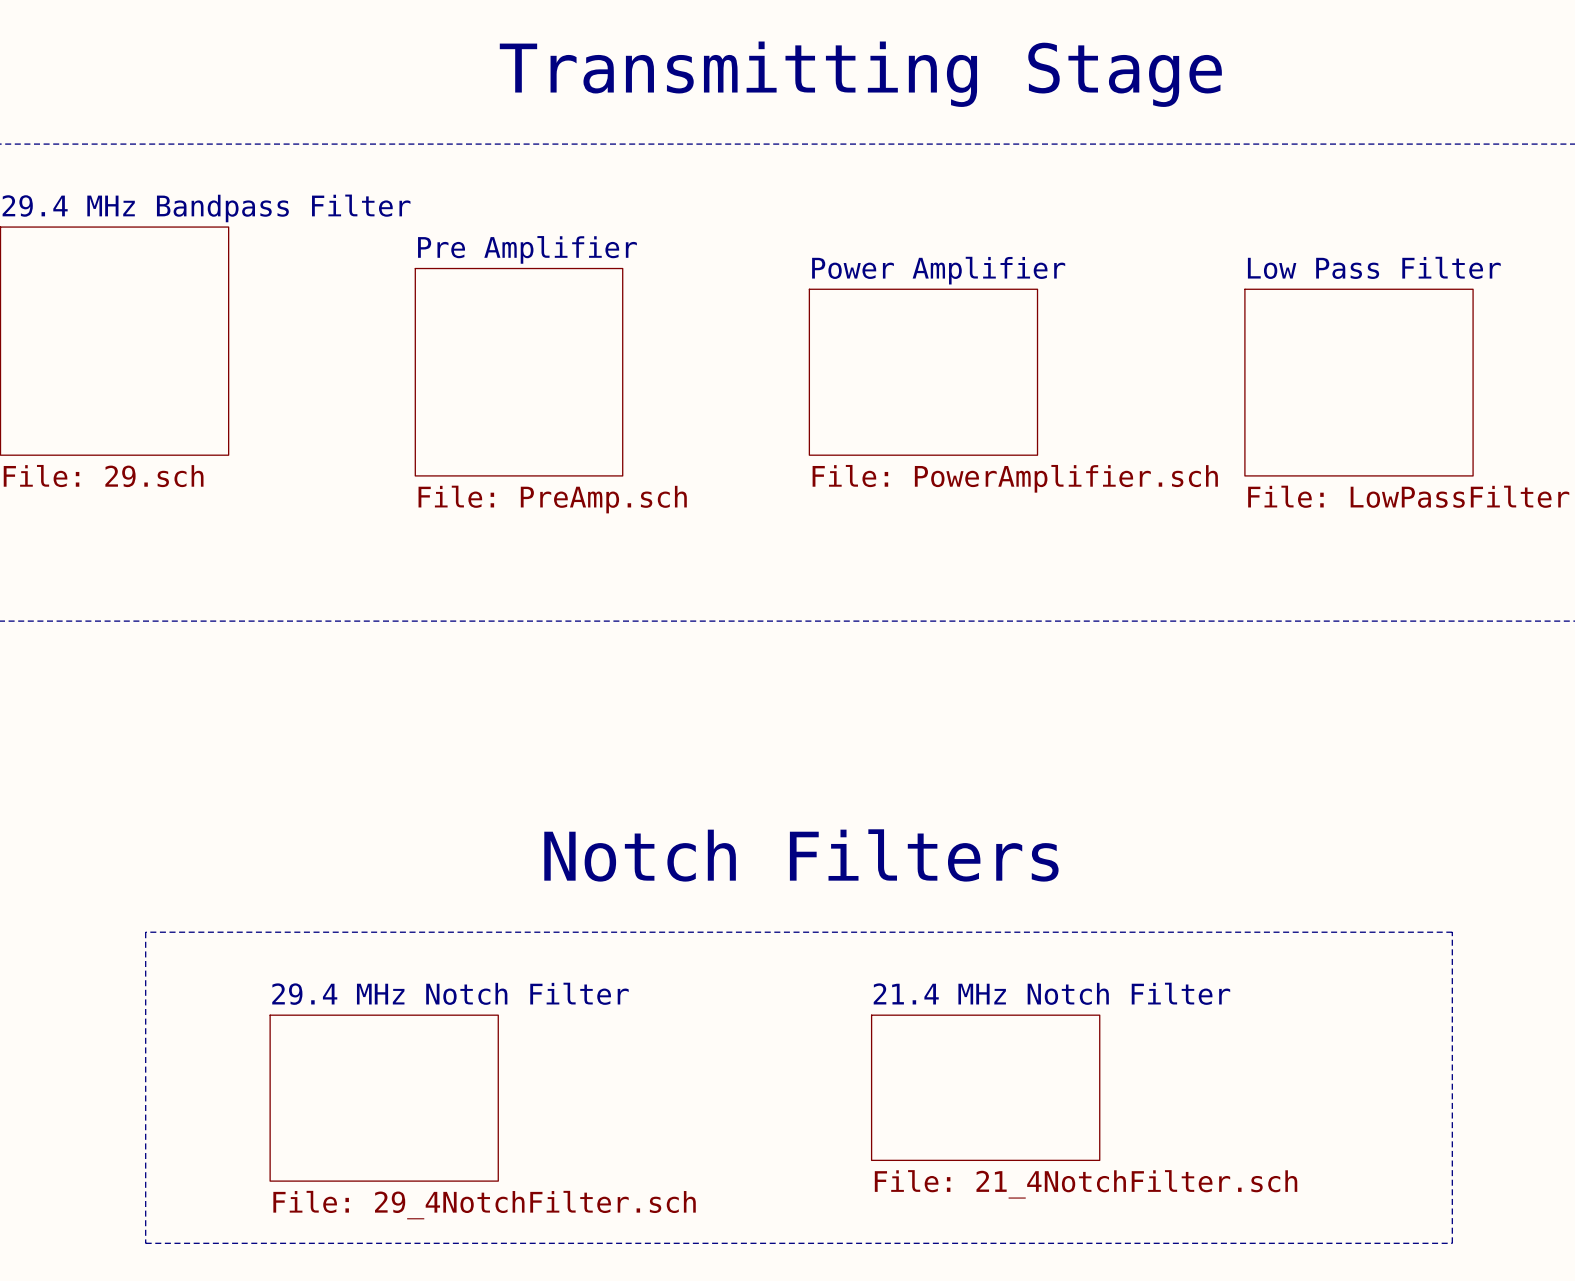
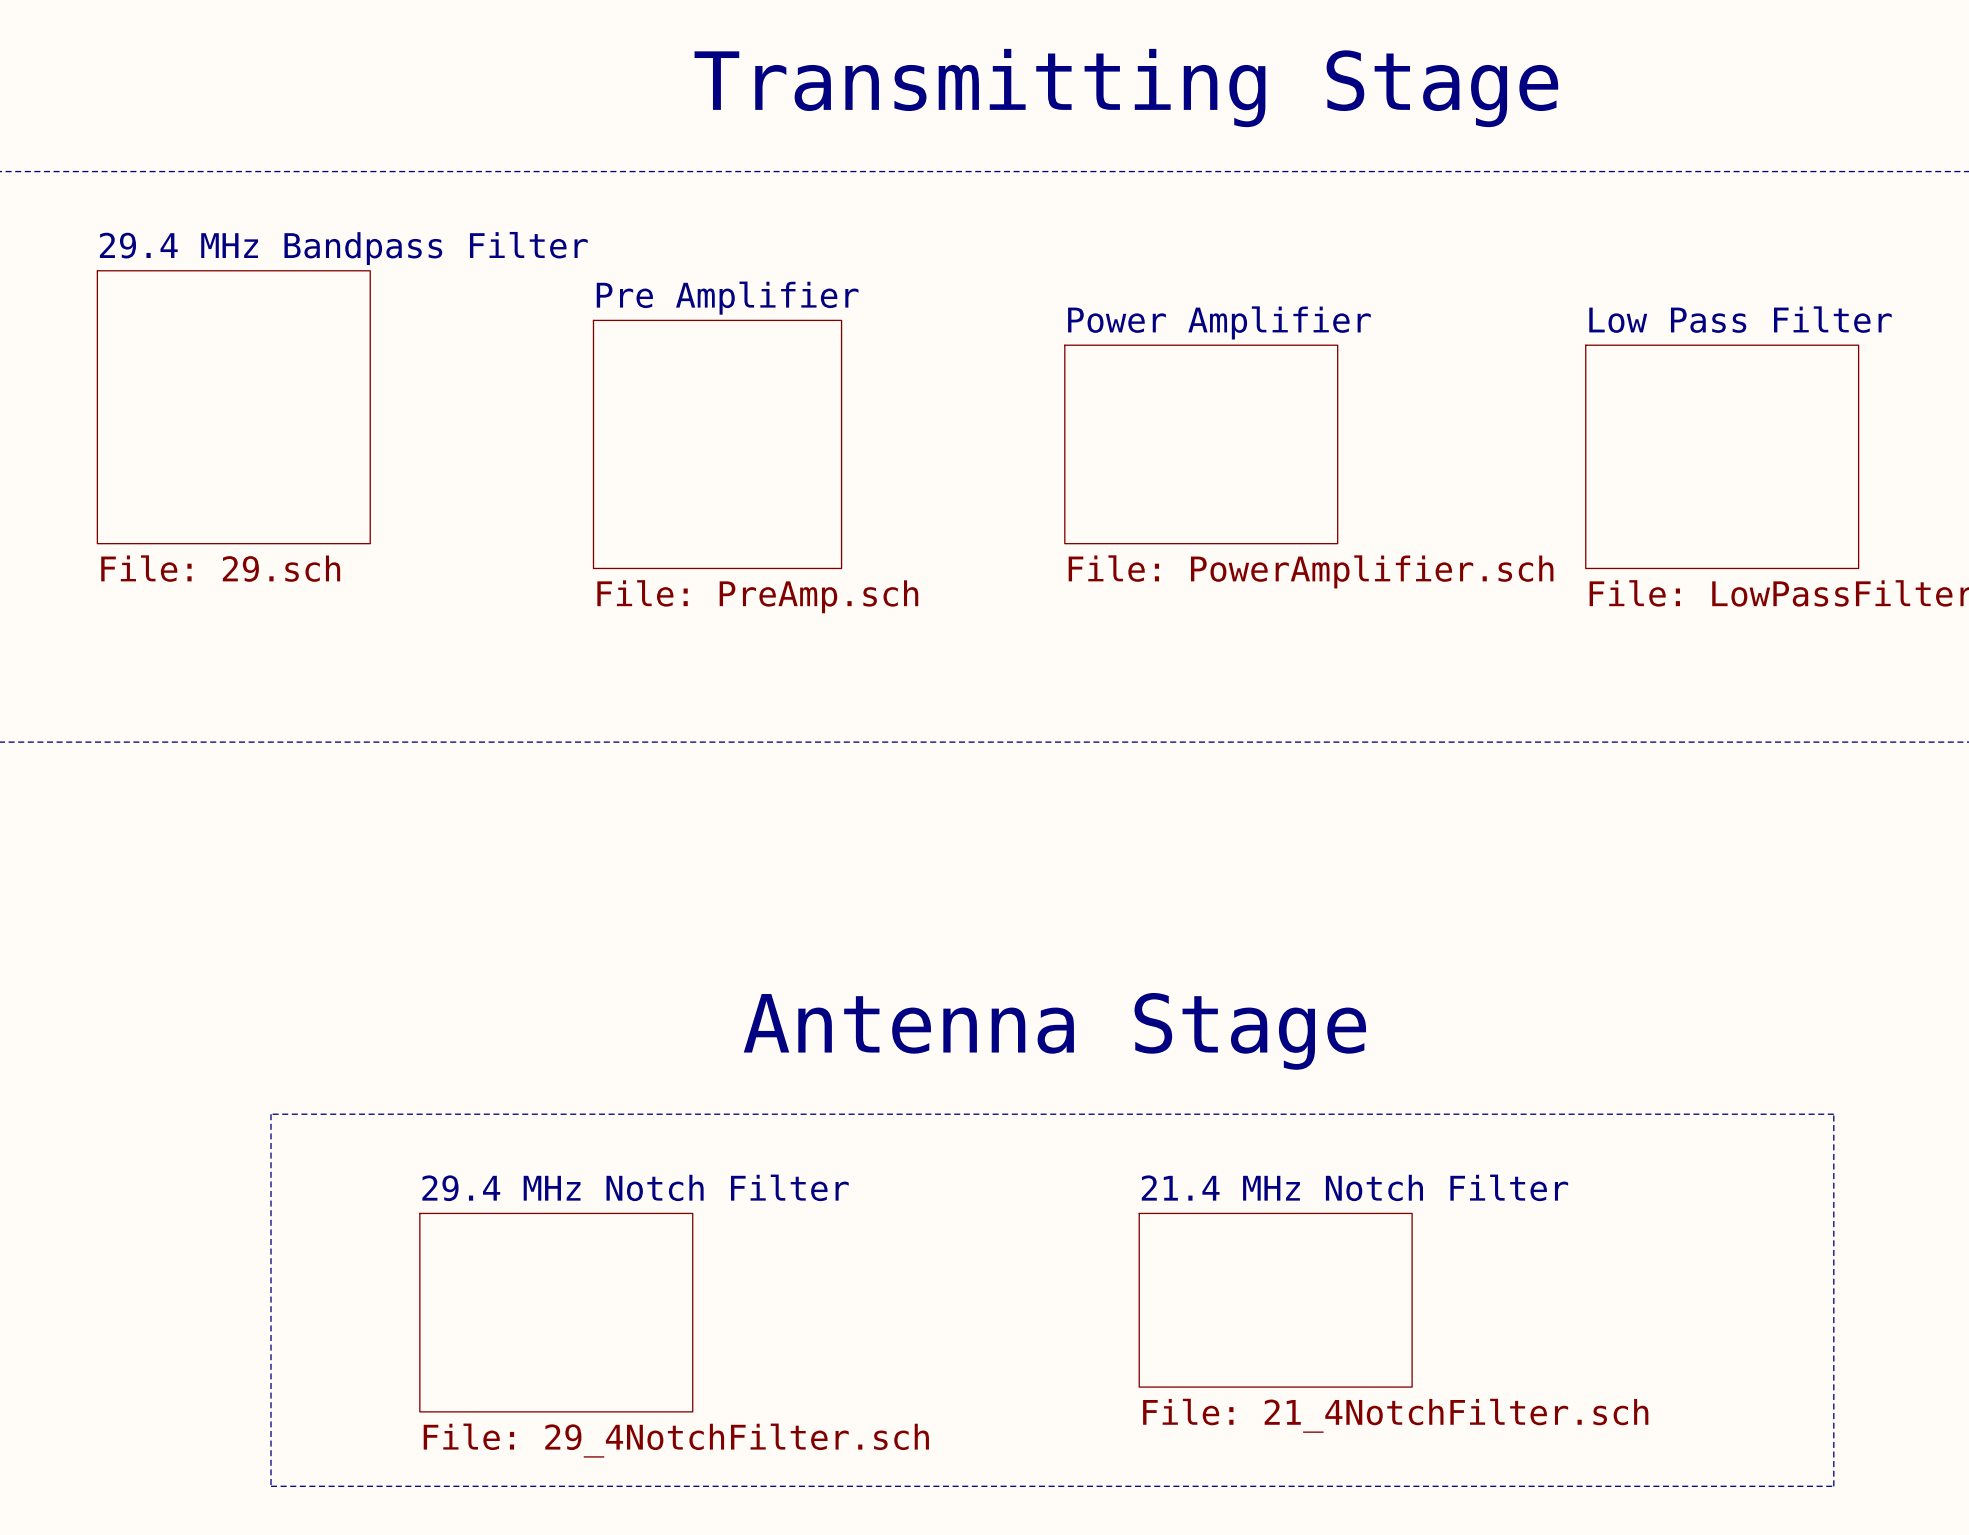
text: Notch Filters (801, 855) -> Antenna Stage (1054, 1031)

